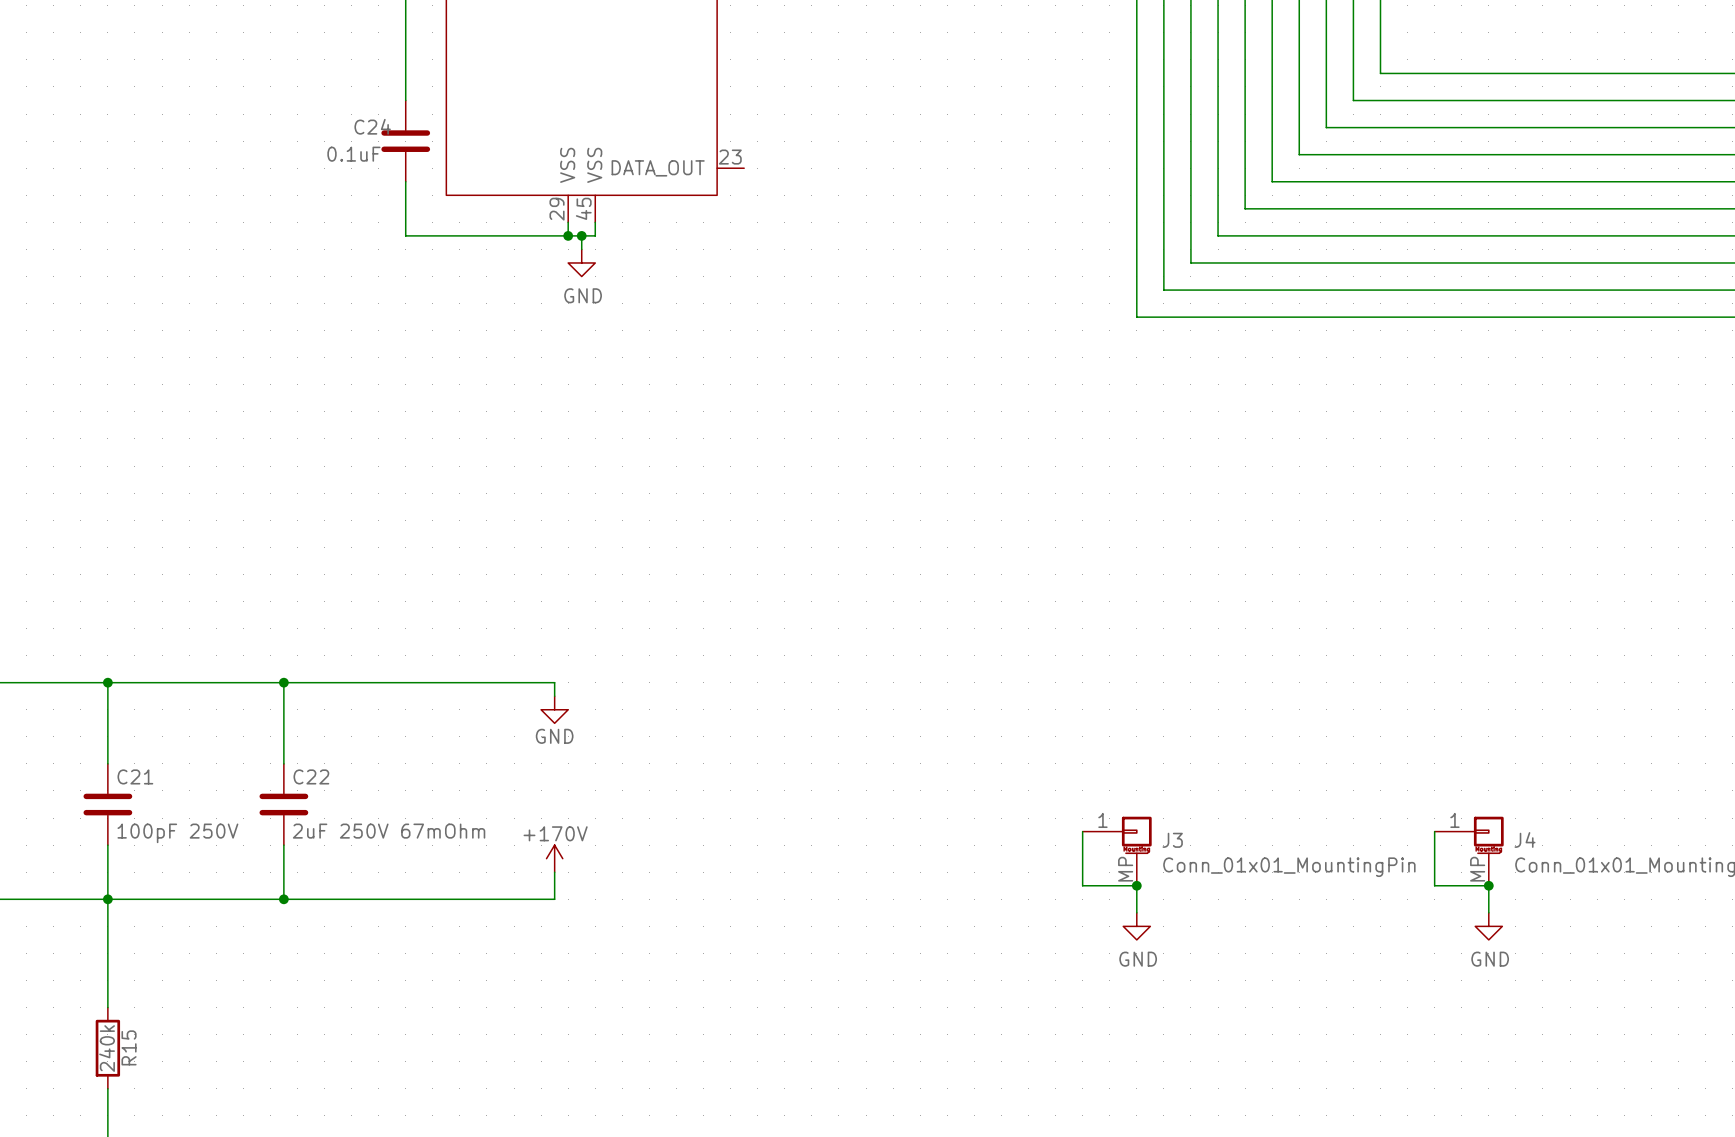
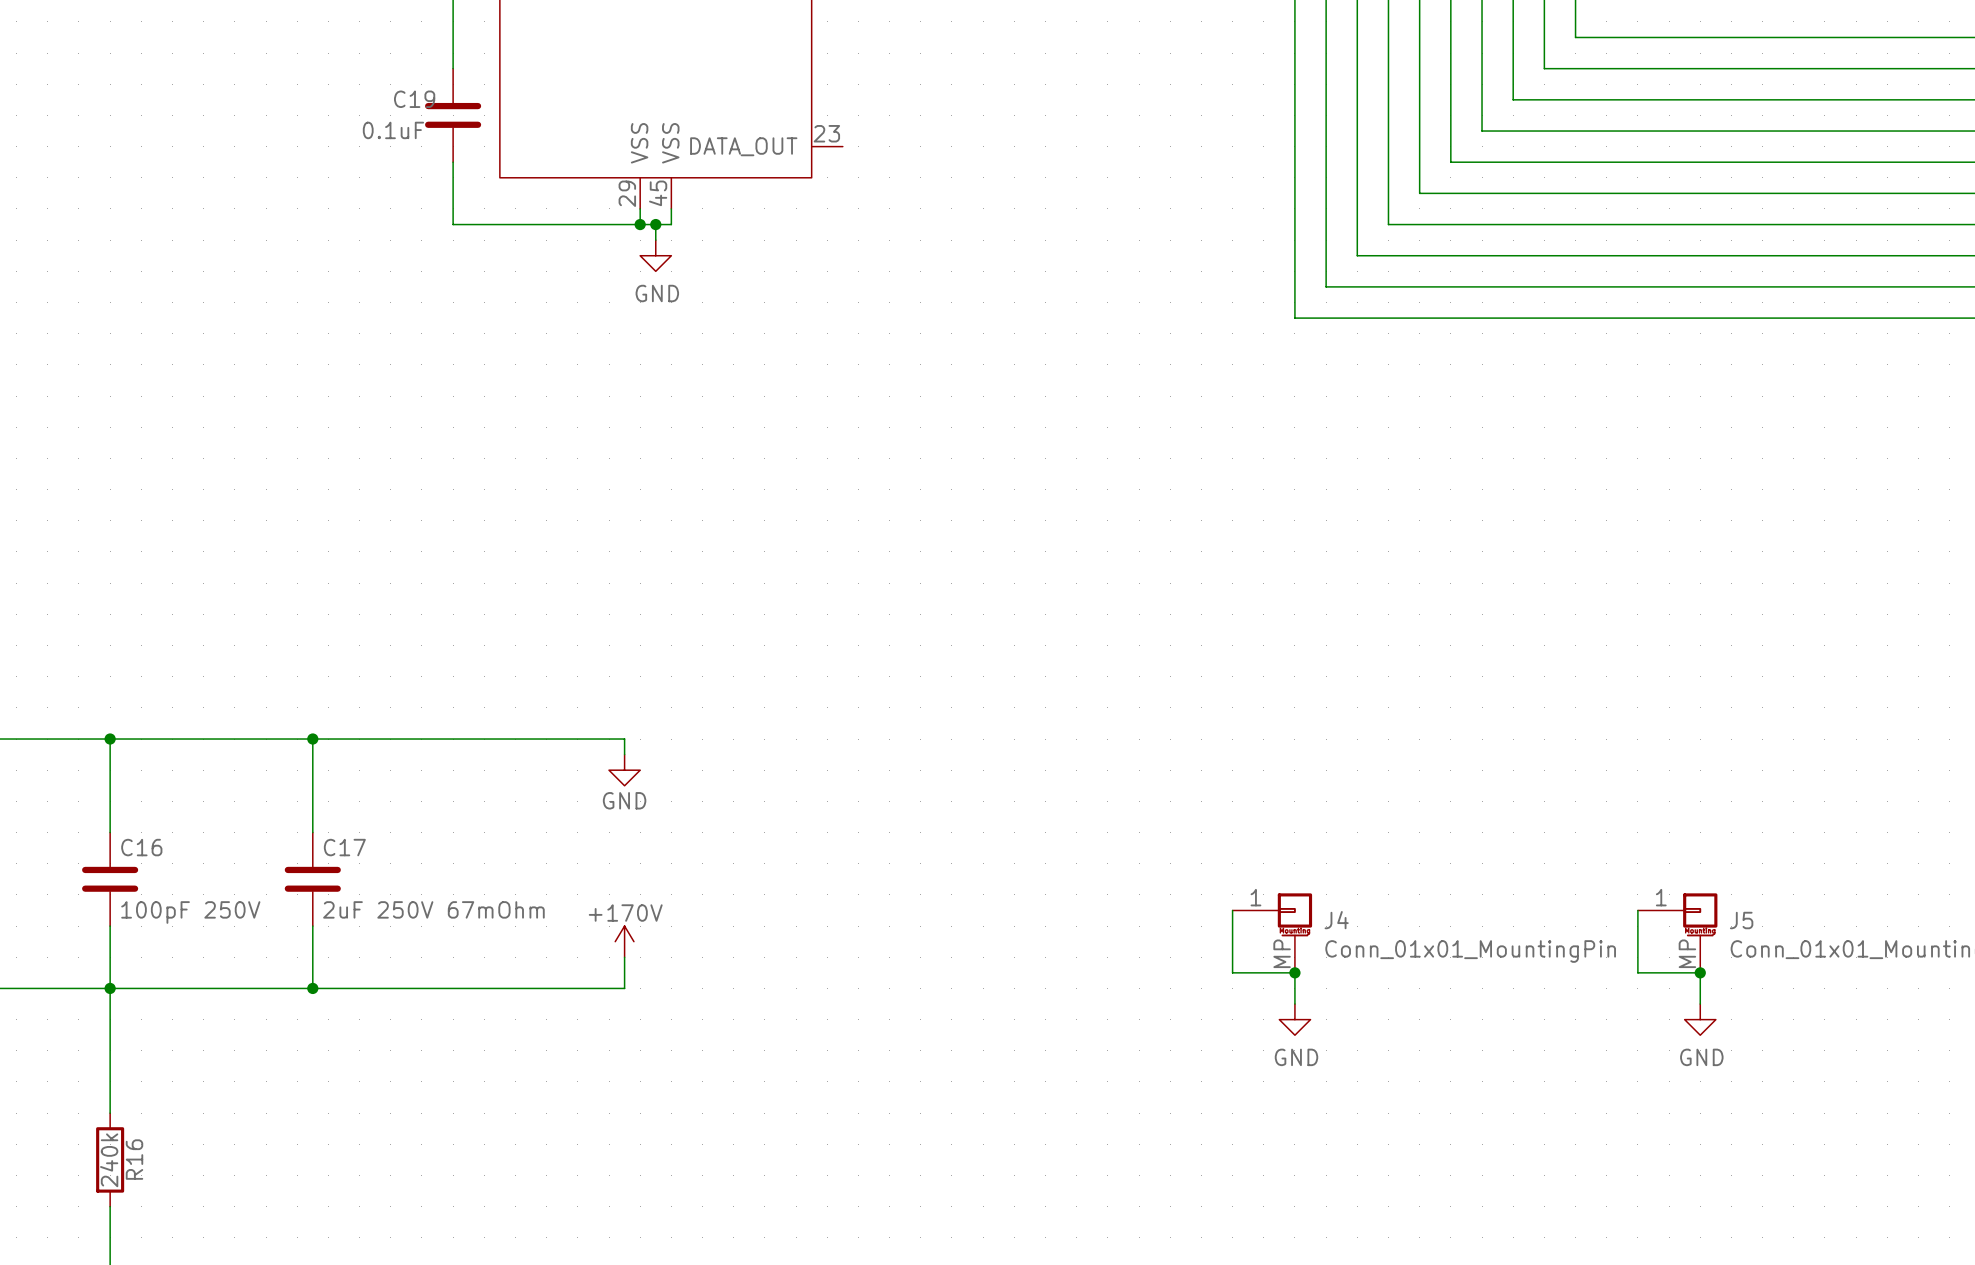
C24 name: C24 (372, 126) -> C19 (414, 99)
C21 name: C21 (135, 776) -> C16 (141, 847)
C22 name: C22 (311, 776) -> C17 (344, 847)
J4 name: J4 (1525, 839) -> J5 (1741, 920)
J3 name: J3 (1172, 840) -> J4 (1336, 920)
R15 name: R15 (129, 1047) -> R16 (134, 1159)

